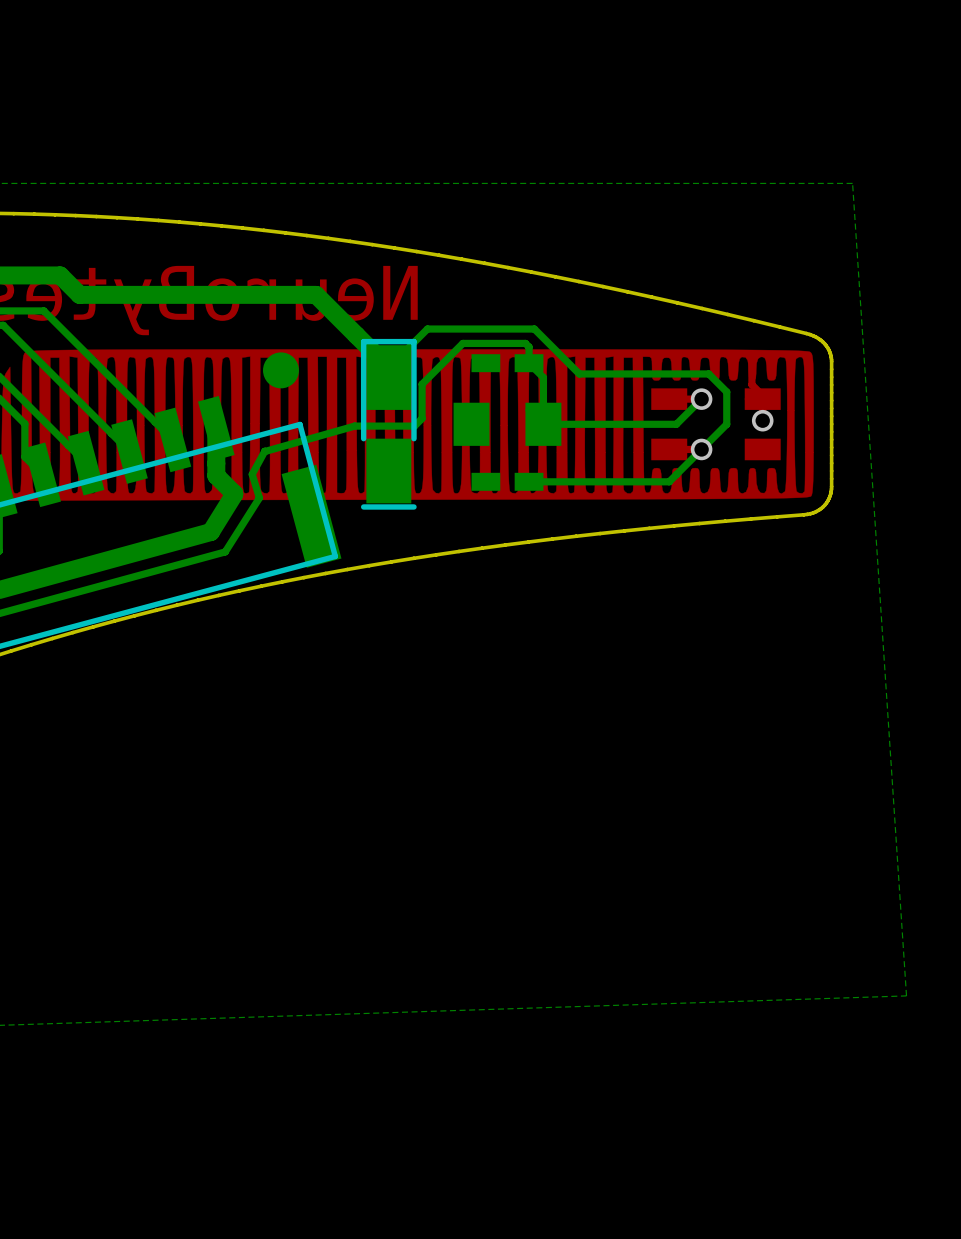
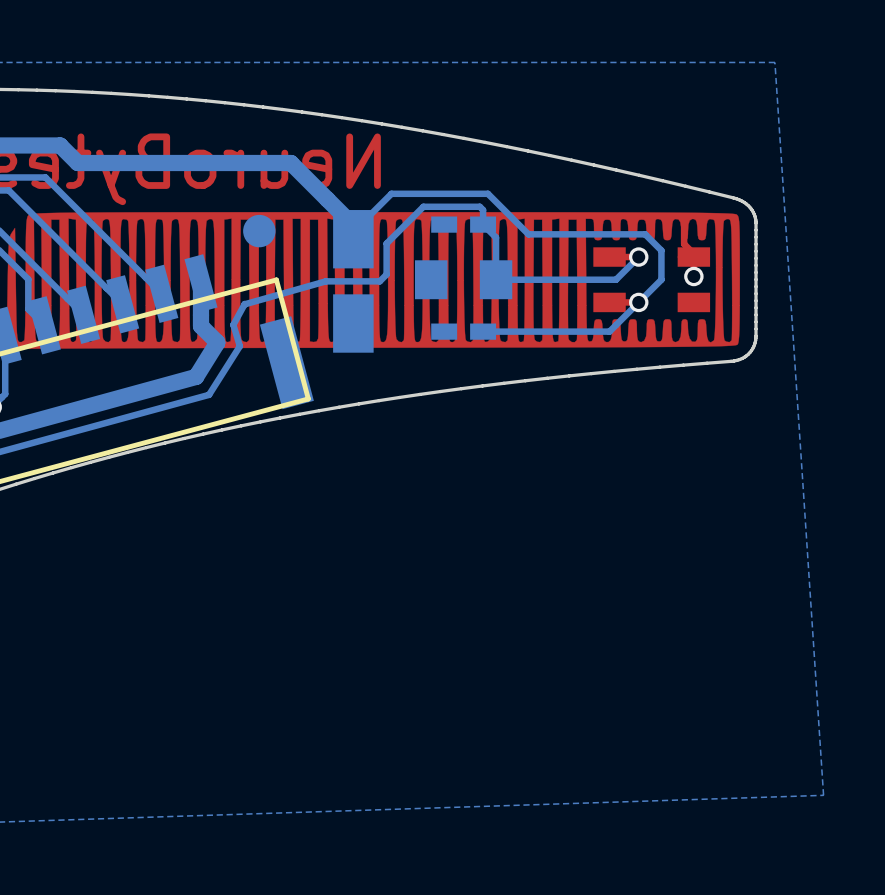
part footprint: [360, 338, 417, 510] -> [333, 210, 374, 353]

